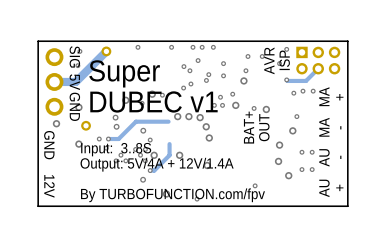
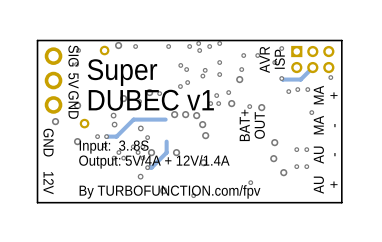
via: none -> (198, 43)
via: none -> (219, 43)
via: none -> (118, 45)
via: (202, 47) -> none
track: (106, 51) (75, 81) (54, 81) -> none
via: none -> (199, 50)
via: (198, 60) -> none
via: none -> (205, 70)
via: (208, 74) -> none
via: none -> (202, 76)
via: none -> (330, 77)
via: (206, 80) -> none
via position: (296, 116) -> (311, 112)
via: (292, 130) -> none

